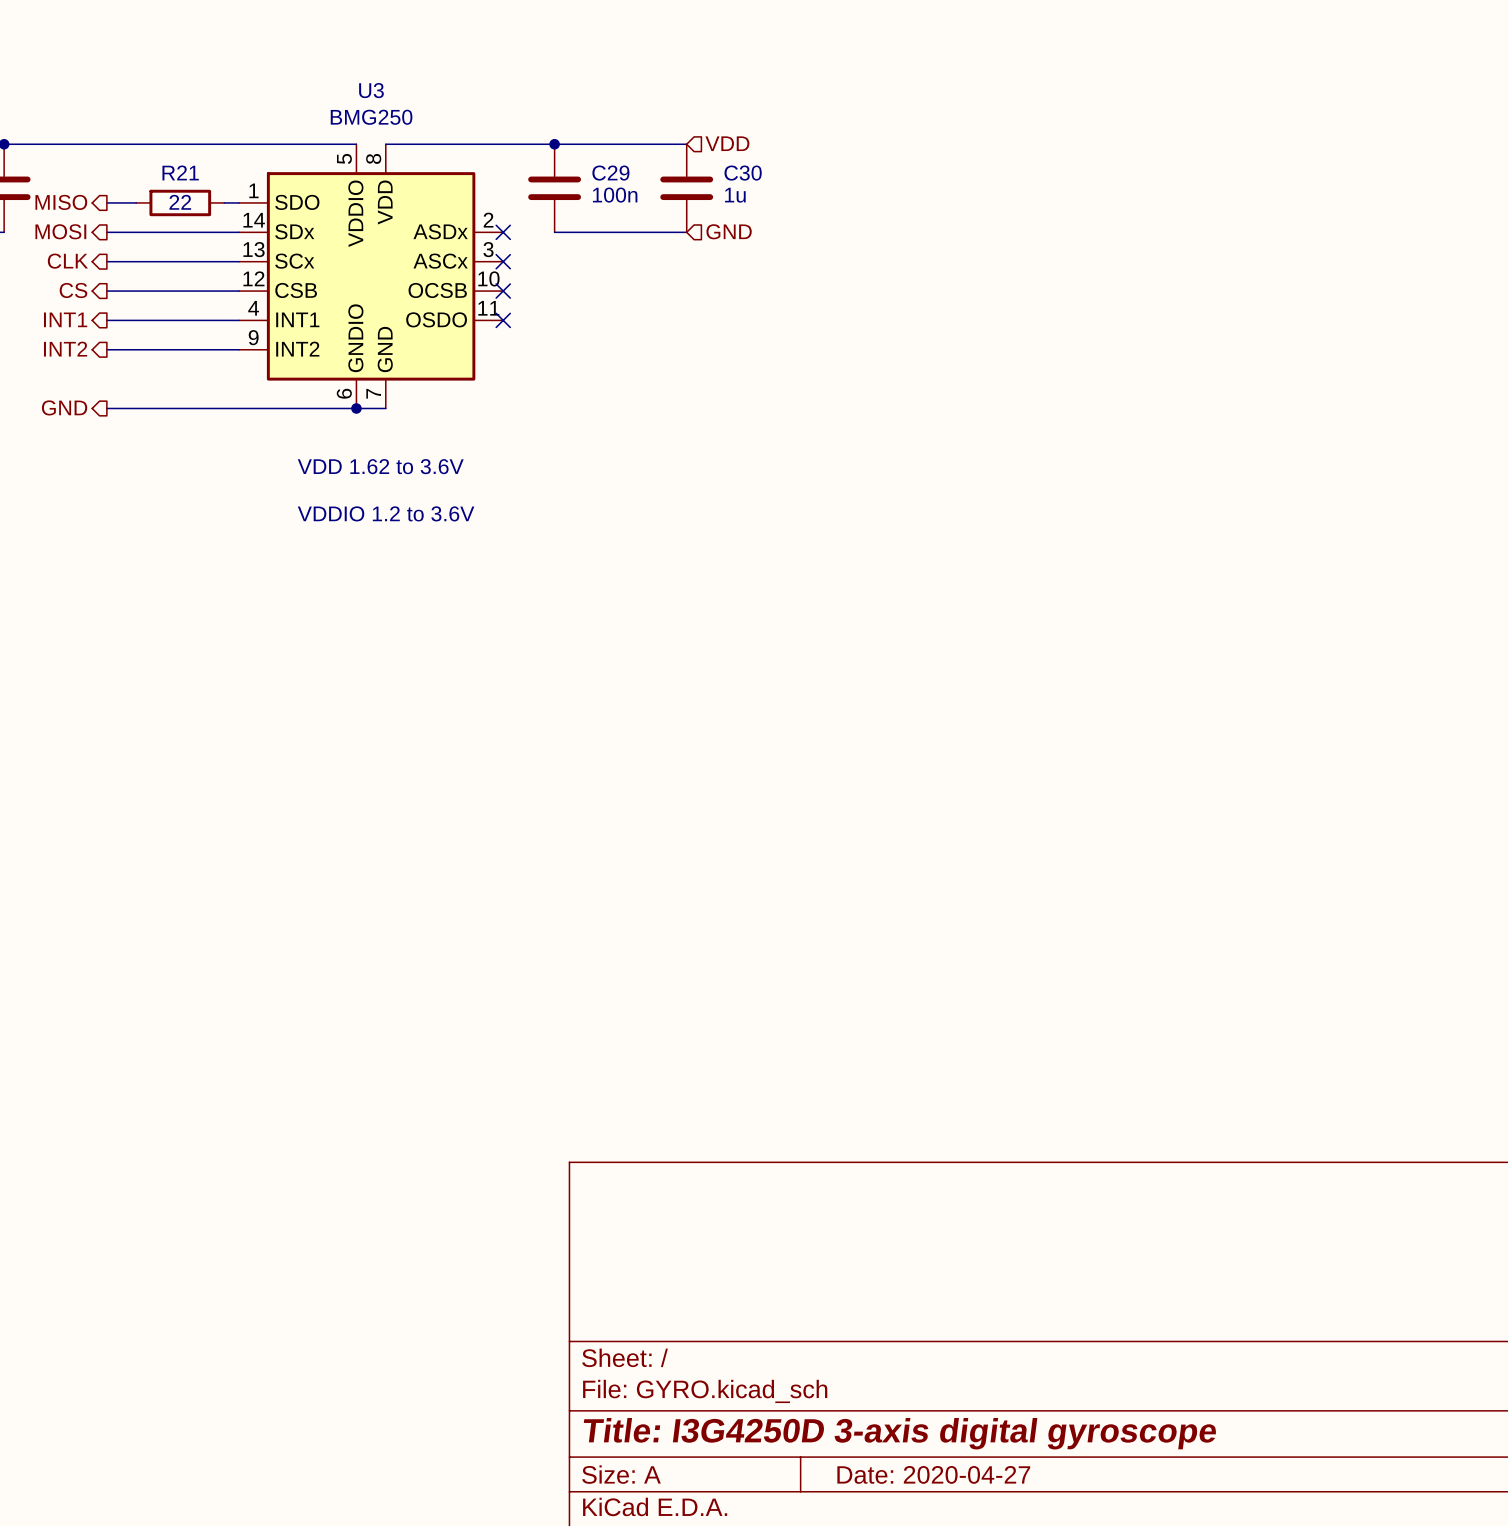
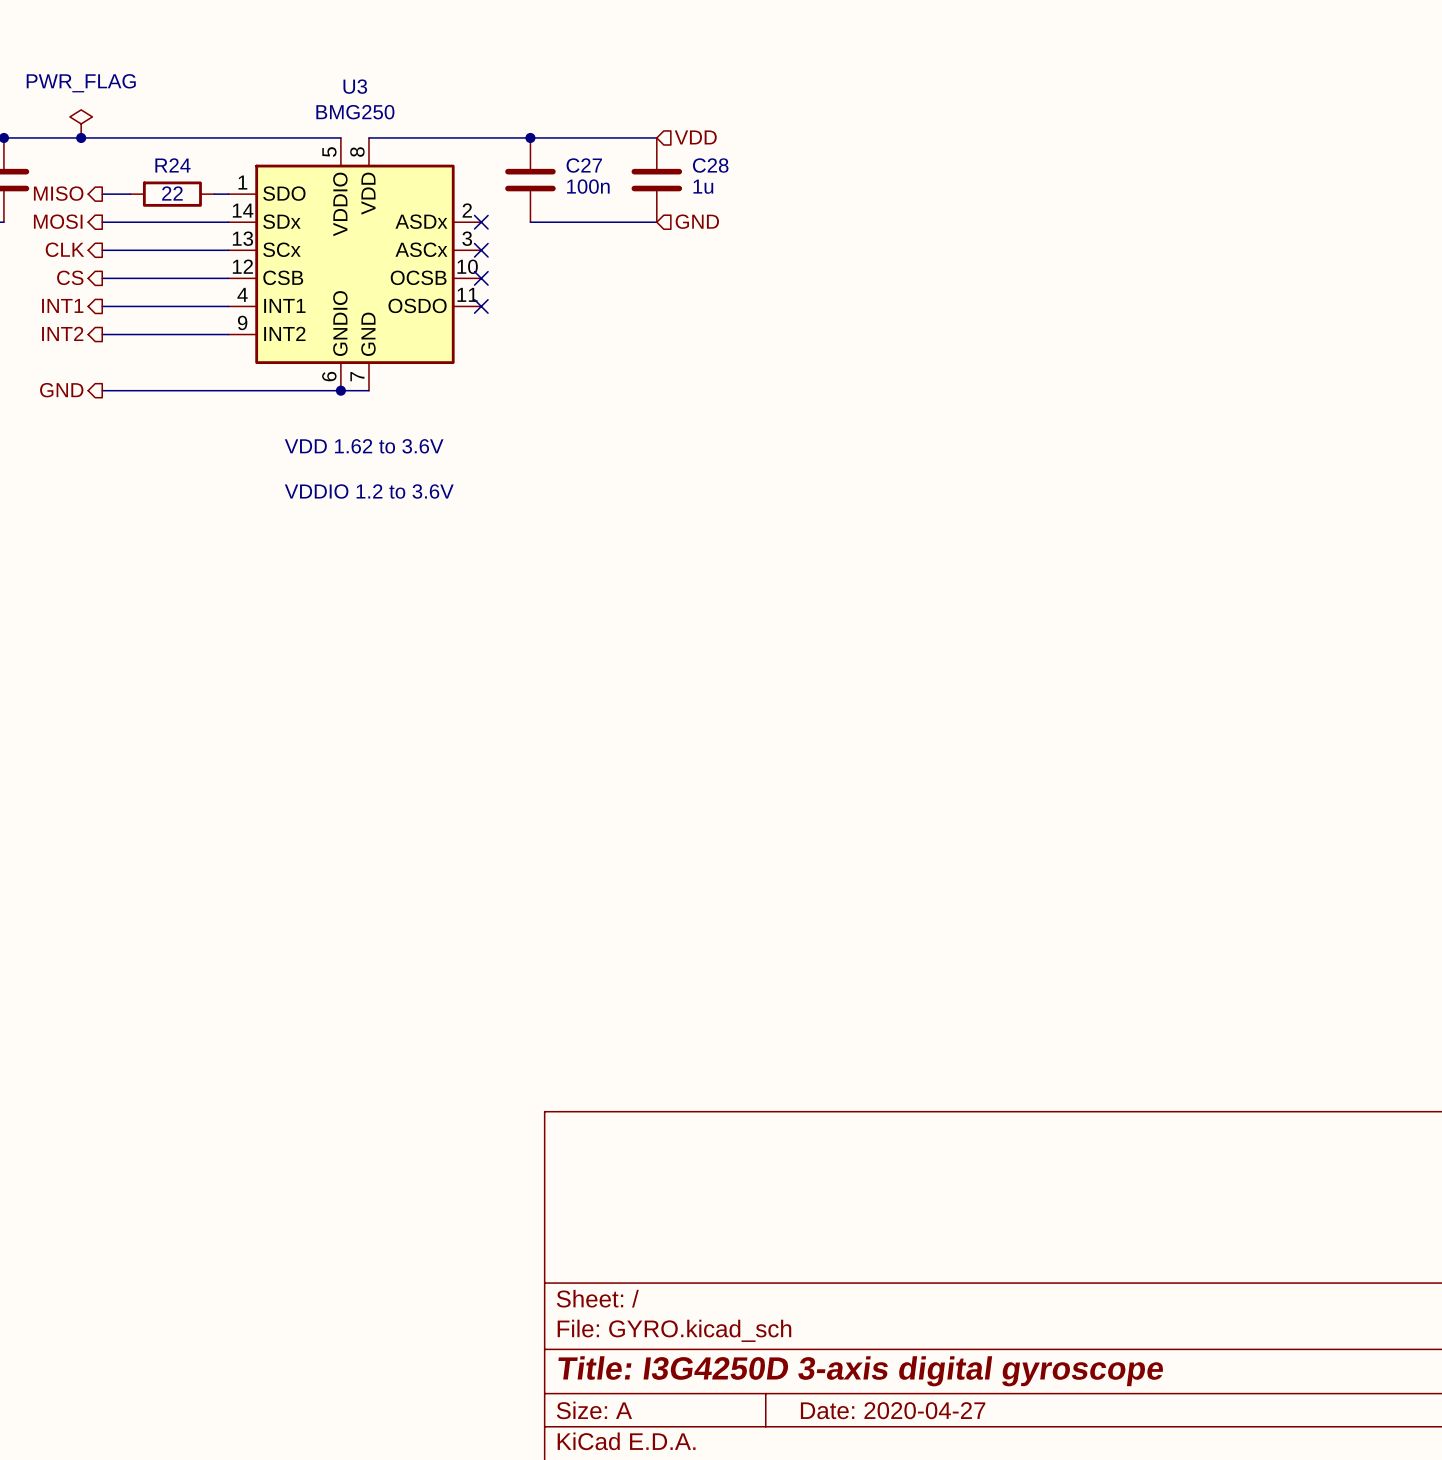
power symbol: none -> PWR_FLAG (81, 123)
junction: none -> (81, 137)
R21 name: R21 (180, 172) -> R24 (172, 165)
C29 name: C29 (610, 173) -> C27 (584, 165)
C30 name: C30 (743, 173) -> C28 (710, 165)

